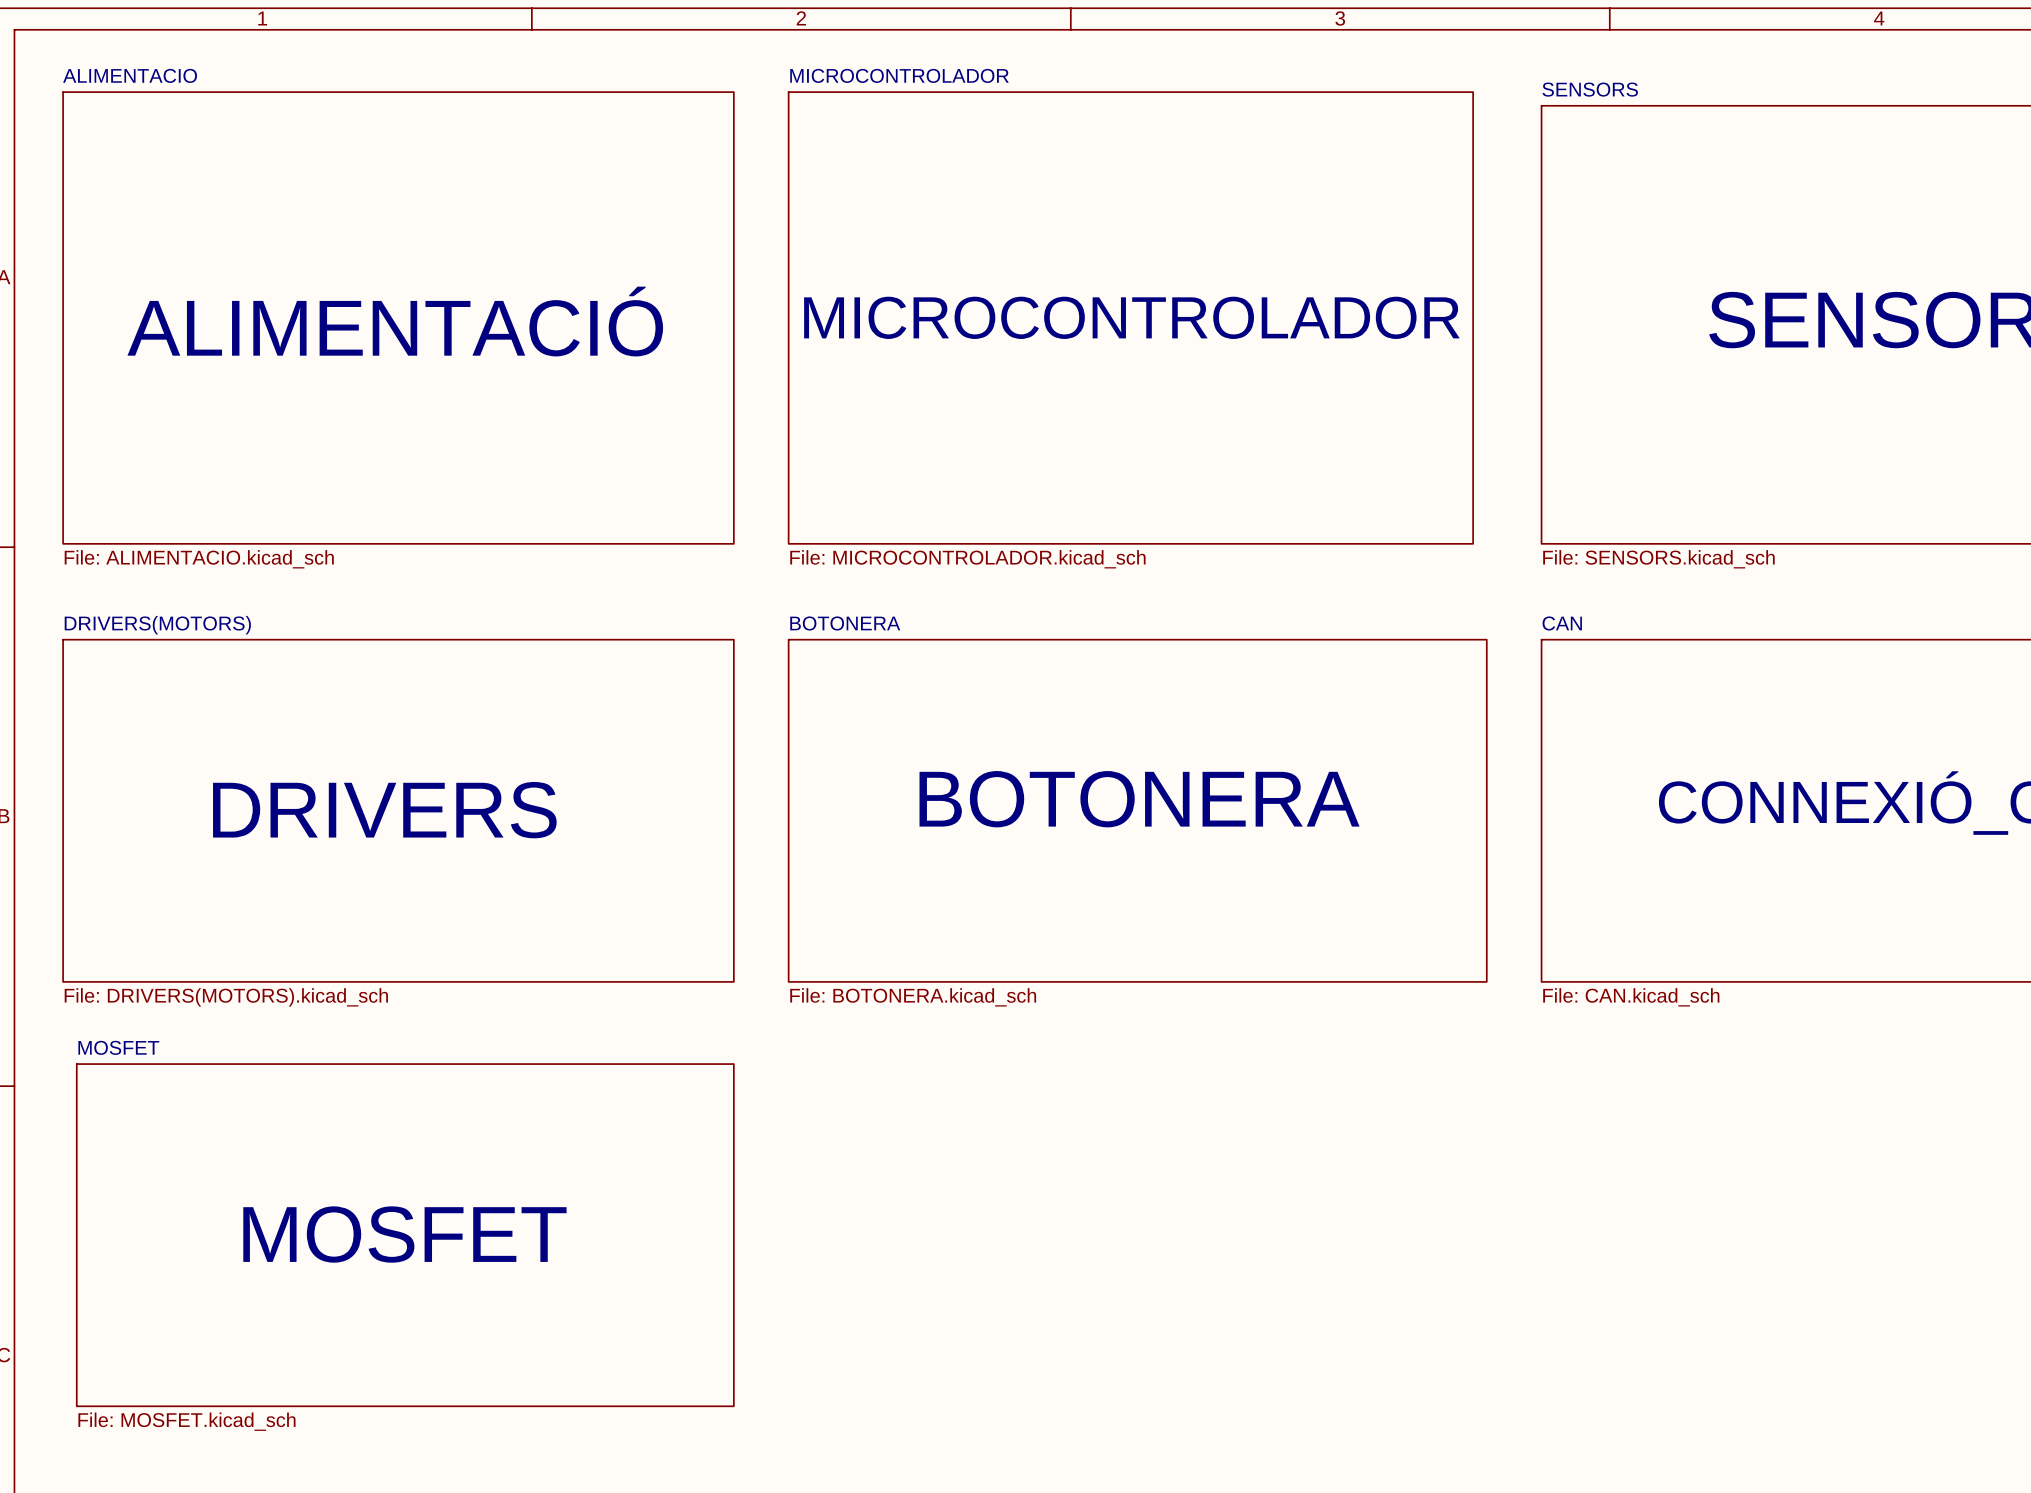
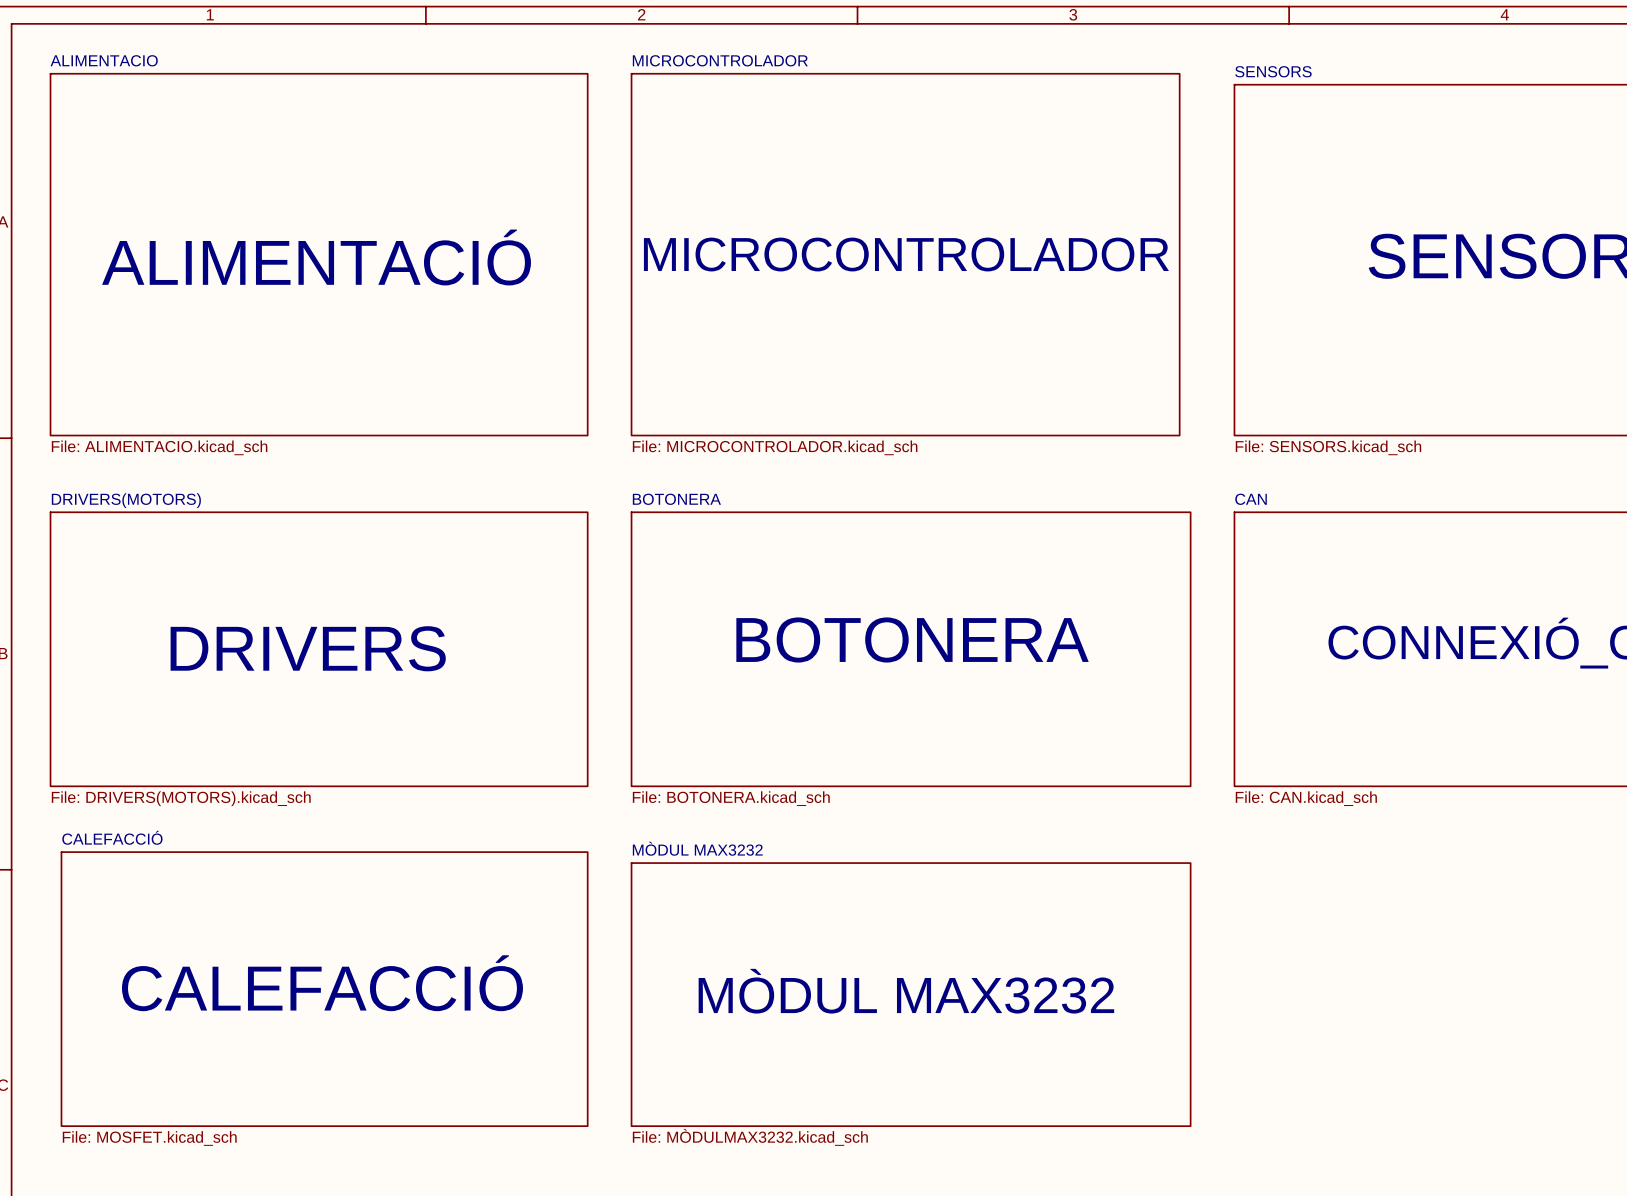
sheet MOSFET name: MOSFET (118, 1047) -> CALEFACCIÓ (112, 837)
text: MOSFET (404, 1234) -> CALEFACCIÓ (322, 983)
text: none -> MÒDUL MAX3232 (906, 991)
sheet MÒDUL MAX3232: none -> File: MÒDULMAX3232.kicad_sch (911, 994)

